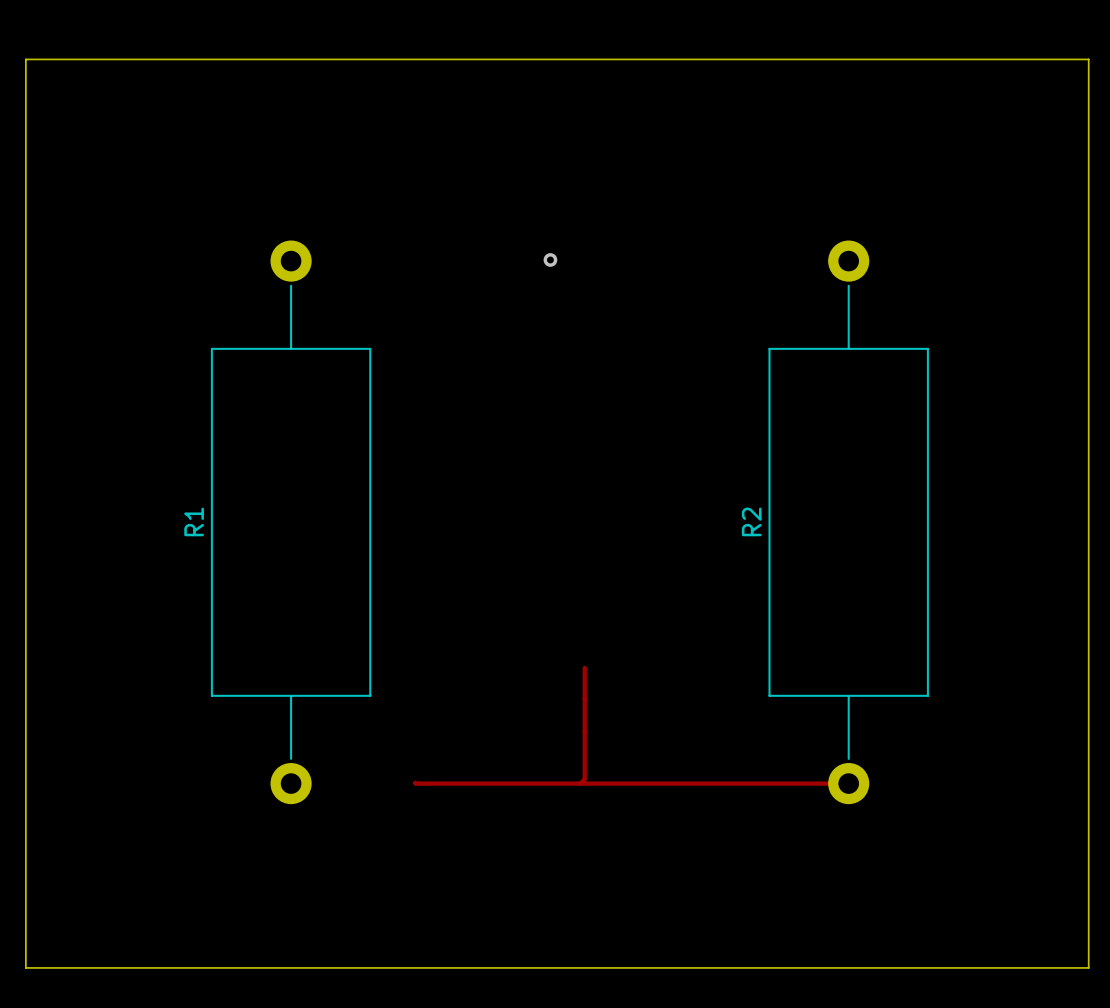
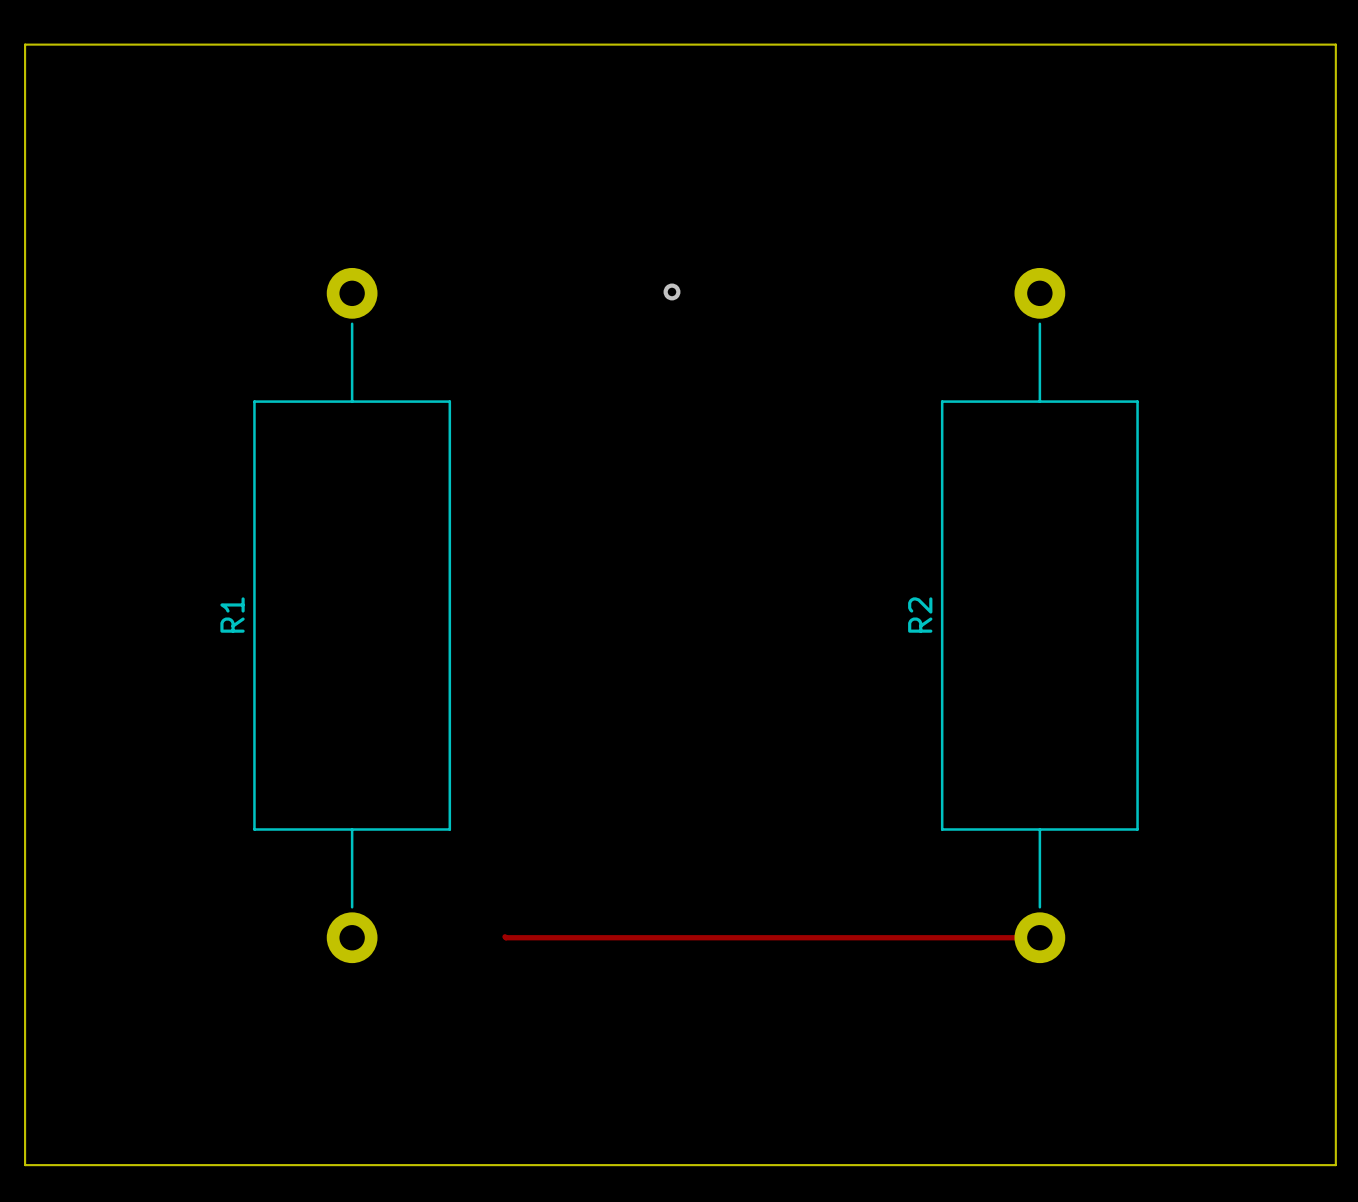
track: (584, 667) (584, 779) (580, 783) -> none

